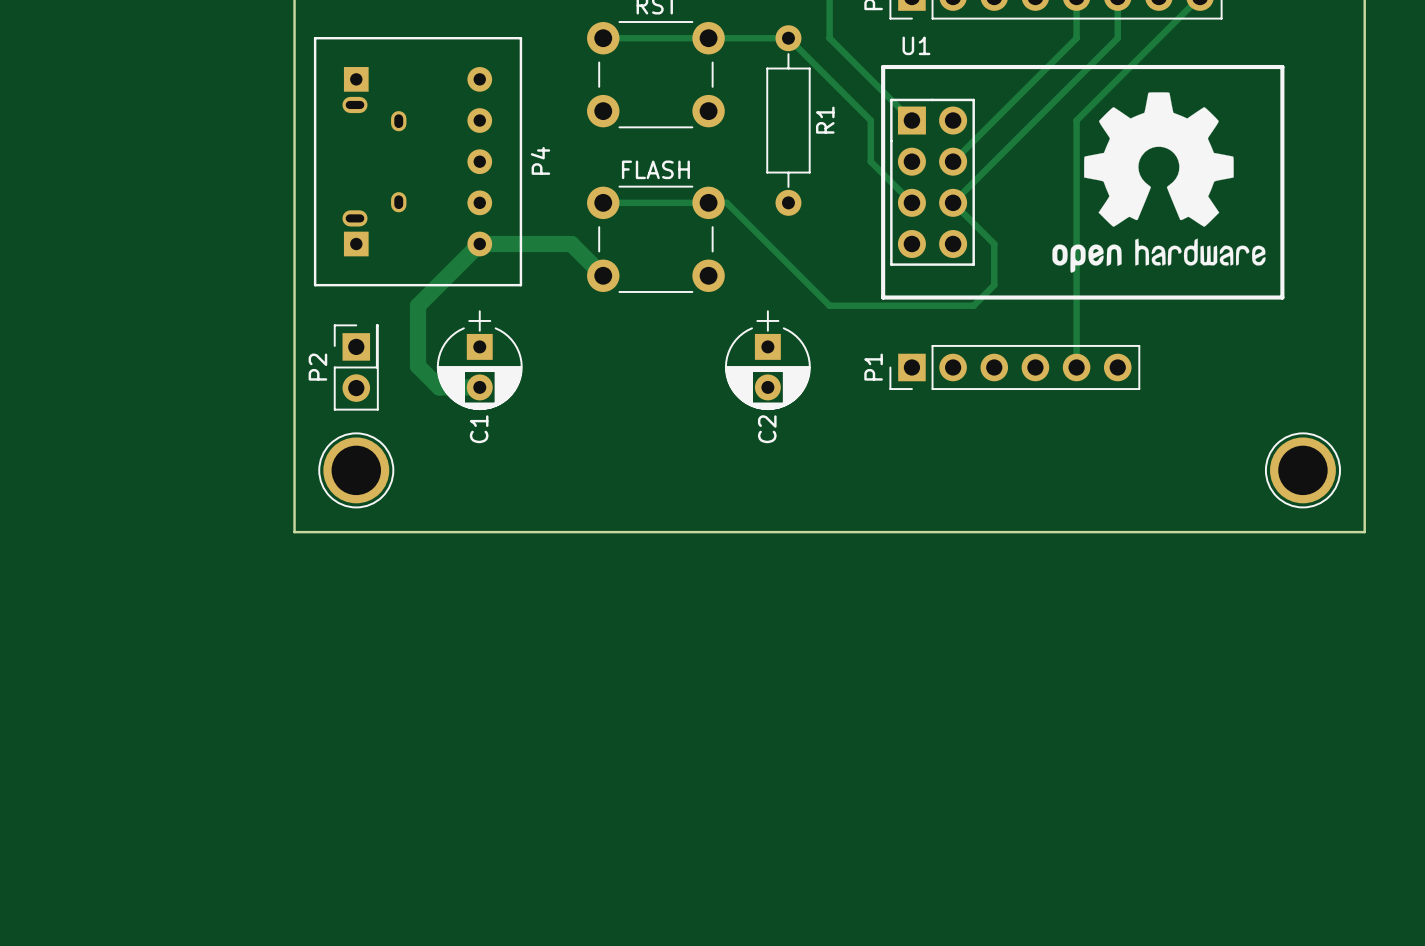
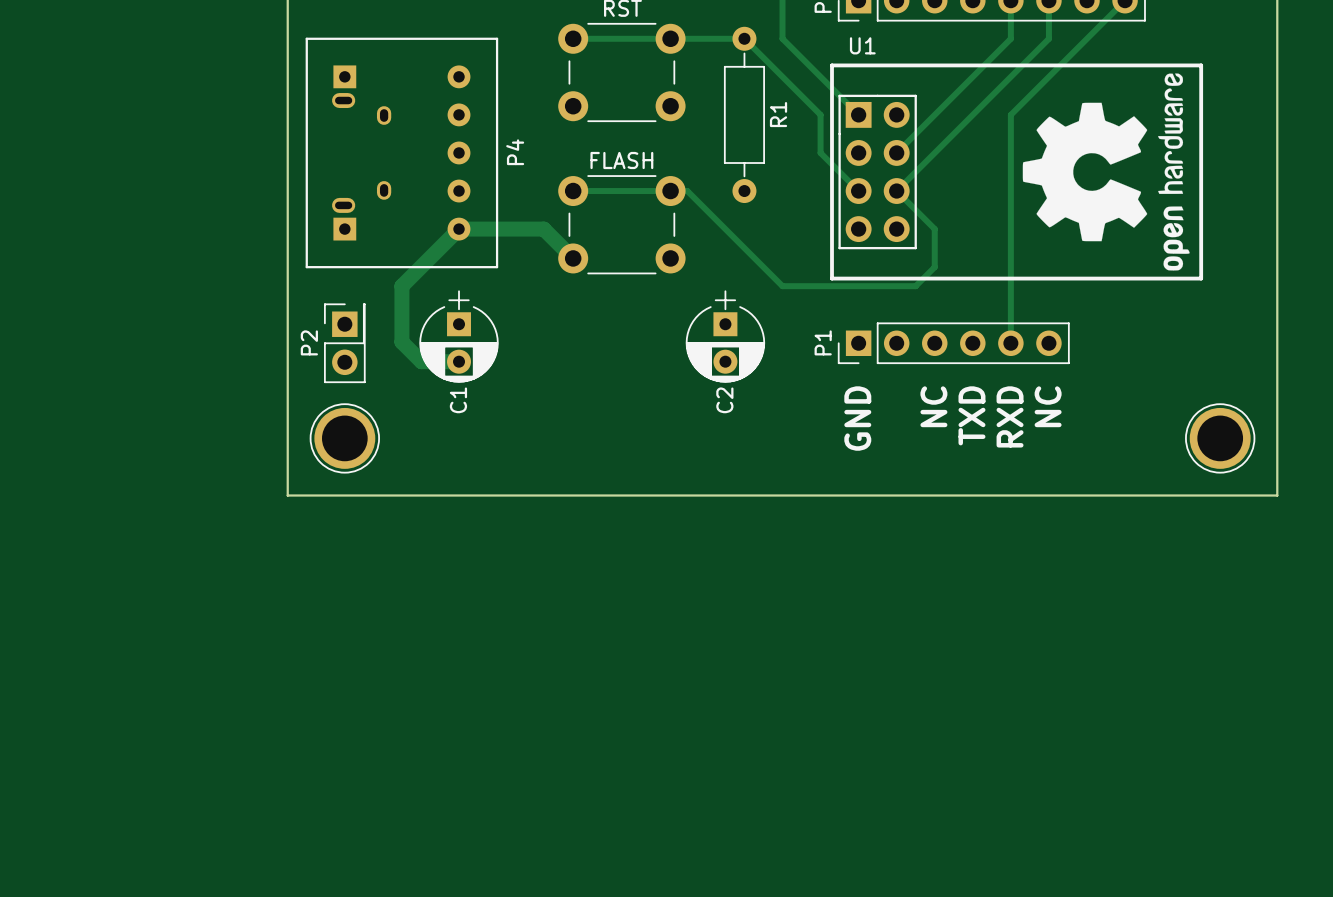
drawing: none -> [1022, 73, 1190, 271]
drawing: [1052, 92, 1266, 273] -> none
text: none -> NC (933, 406)
text: none -> NC (1048, 406)
text: none -> TXD (971, 415)
text: none -> RXD (1010, 416)
text: none -> GND (857, 418)

